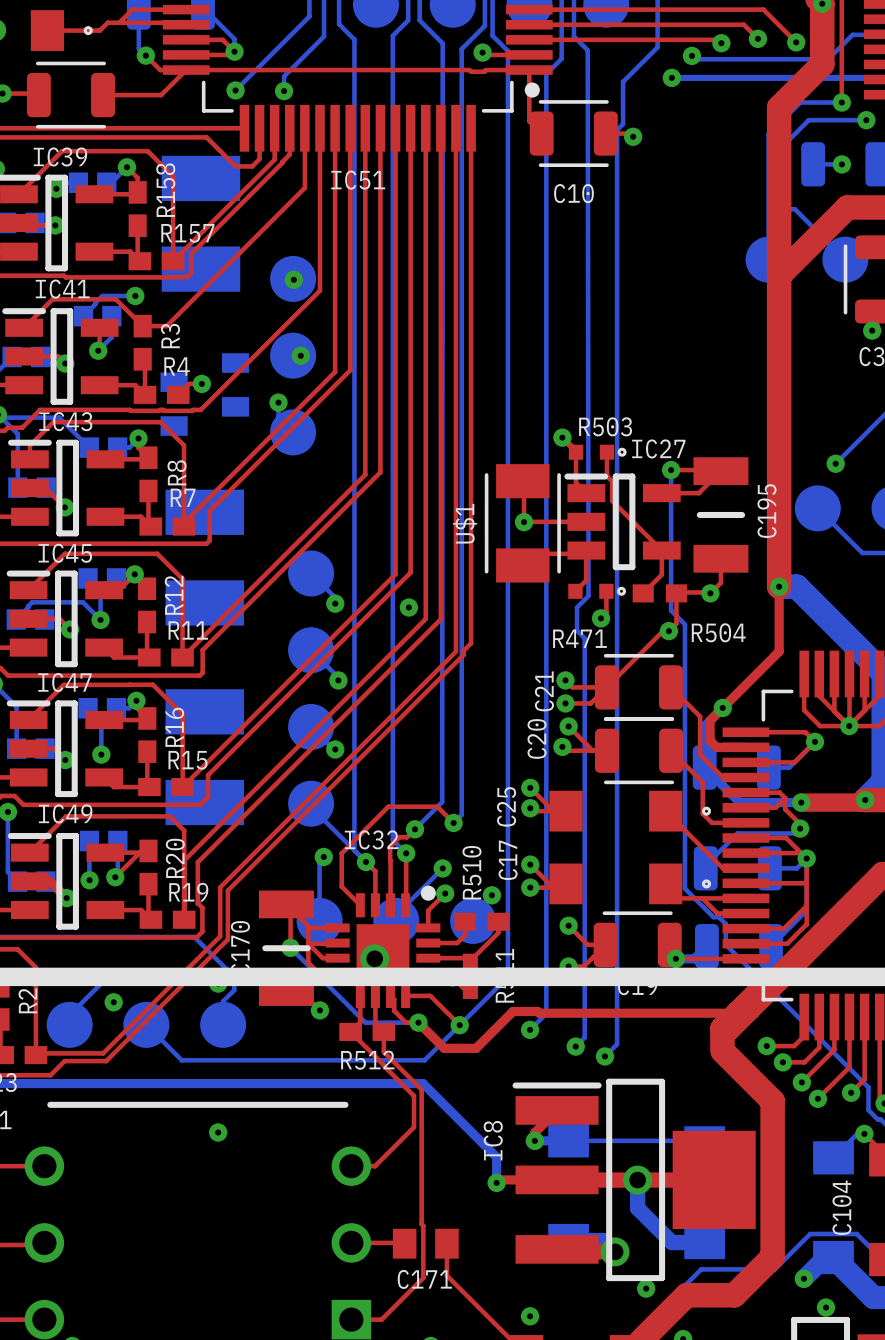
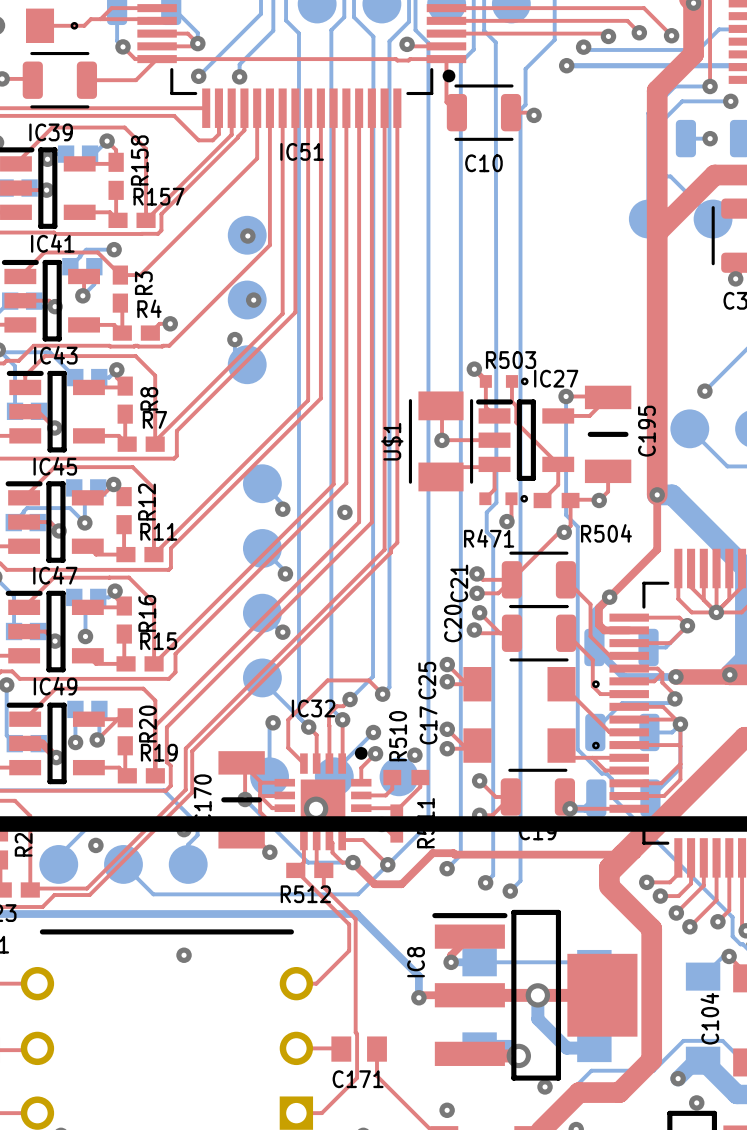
part: (200, 223) -> none
part: (235, 384) -> none
part: (174, 404) -> none
part: (204, 557) -> none
part: (204, 757) -> none

